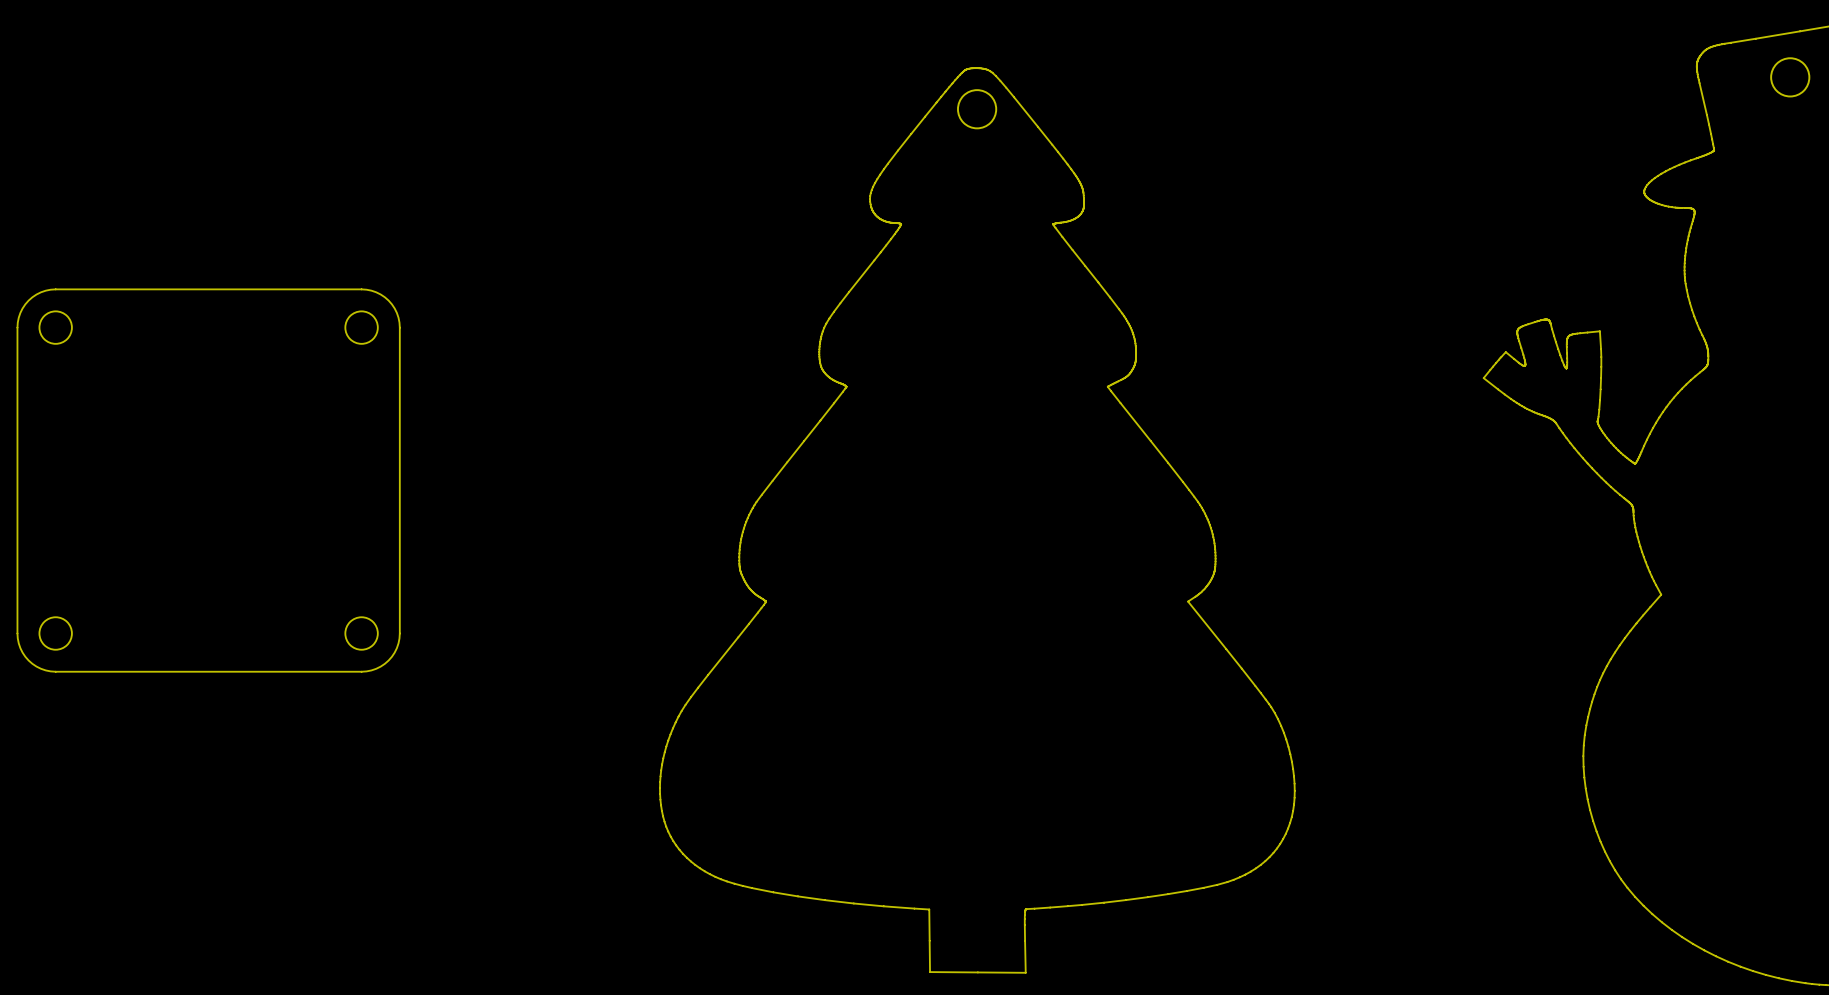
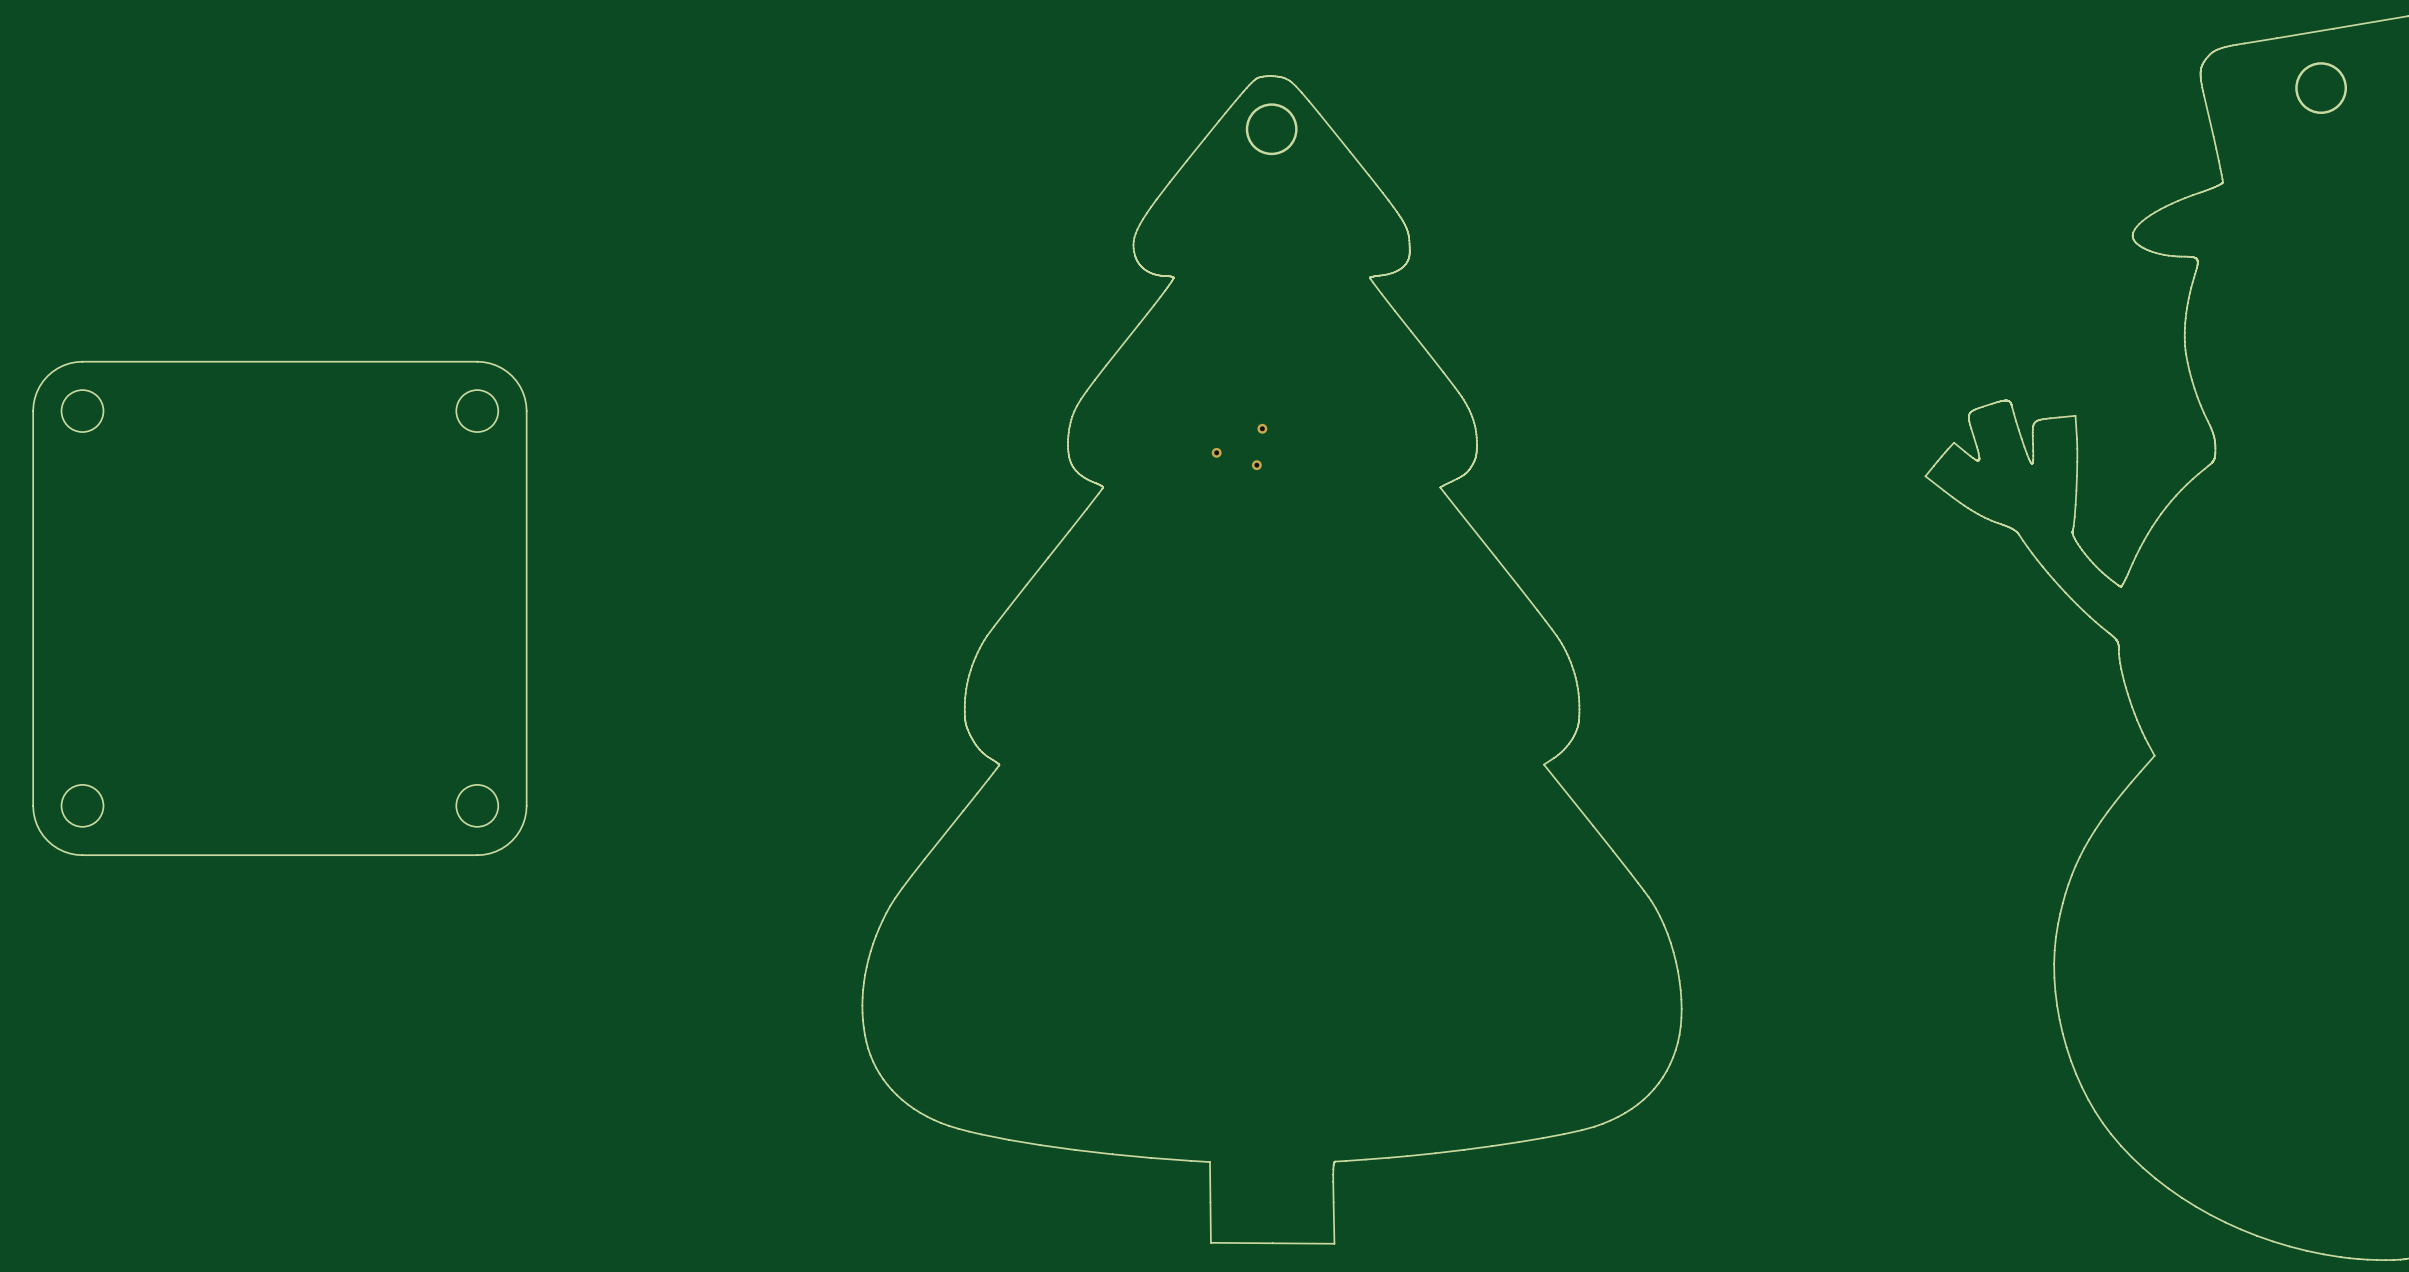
via: none -> (1262, 428)
via: none -> (1216, 452)
via: none -> (1256, 465)

